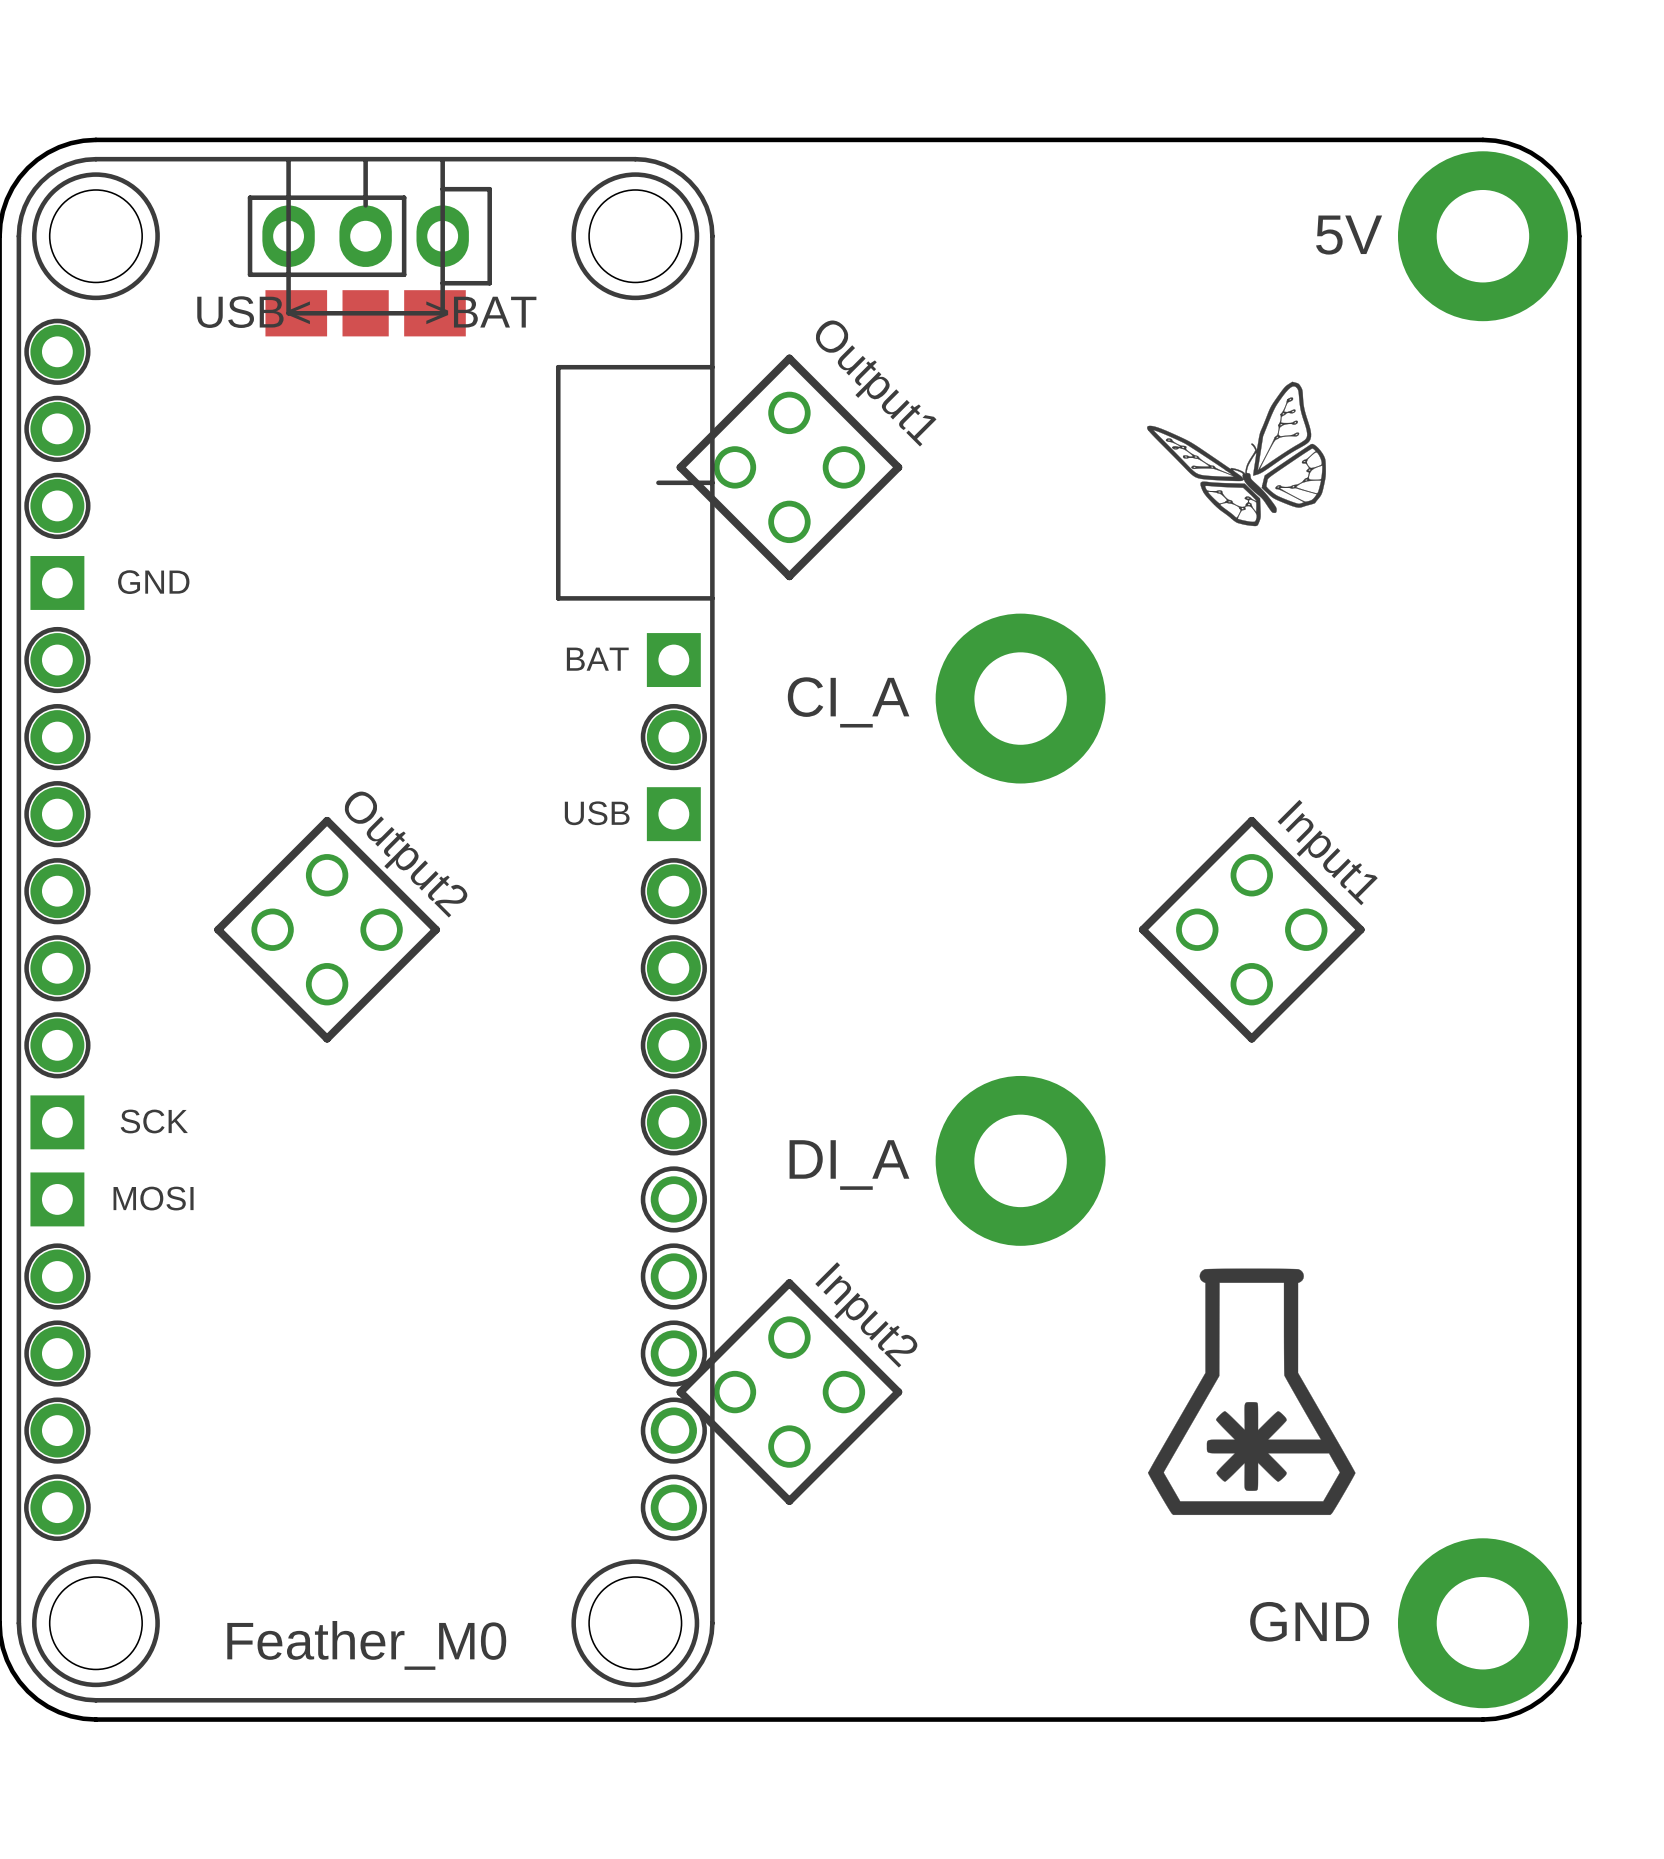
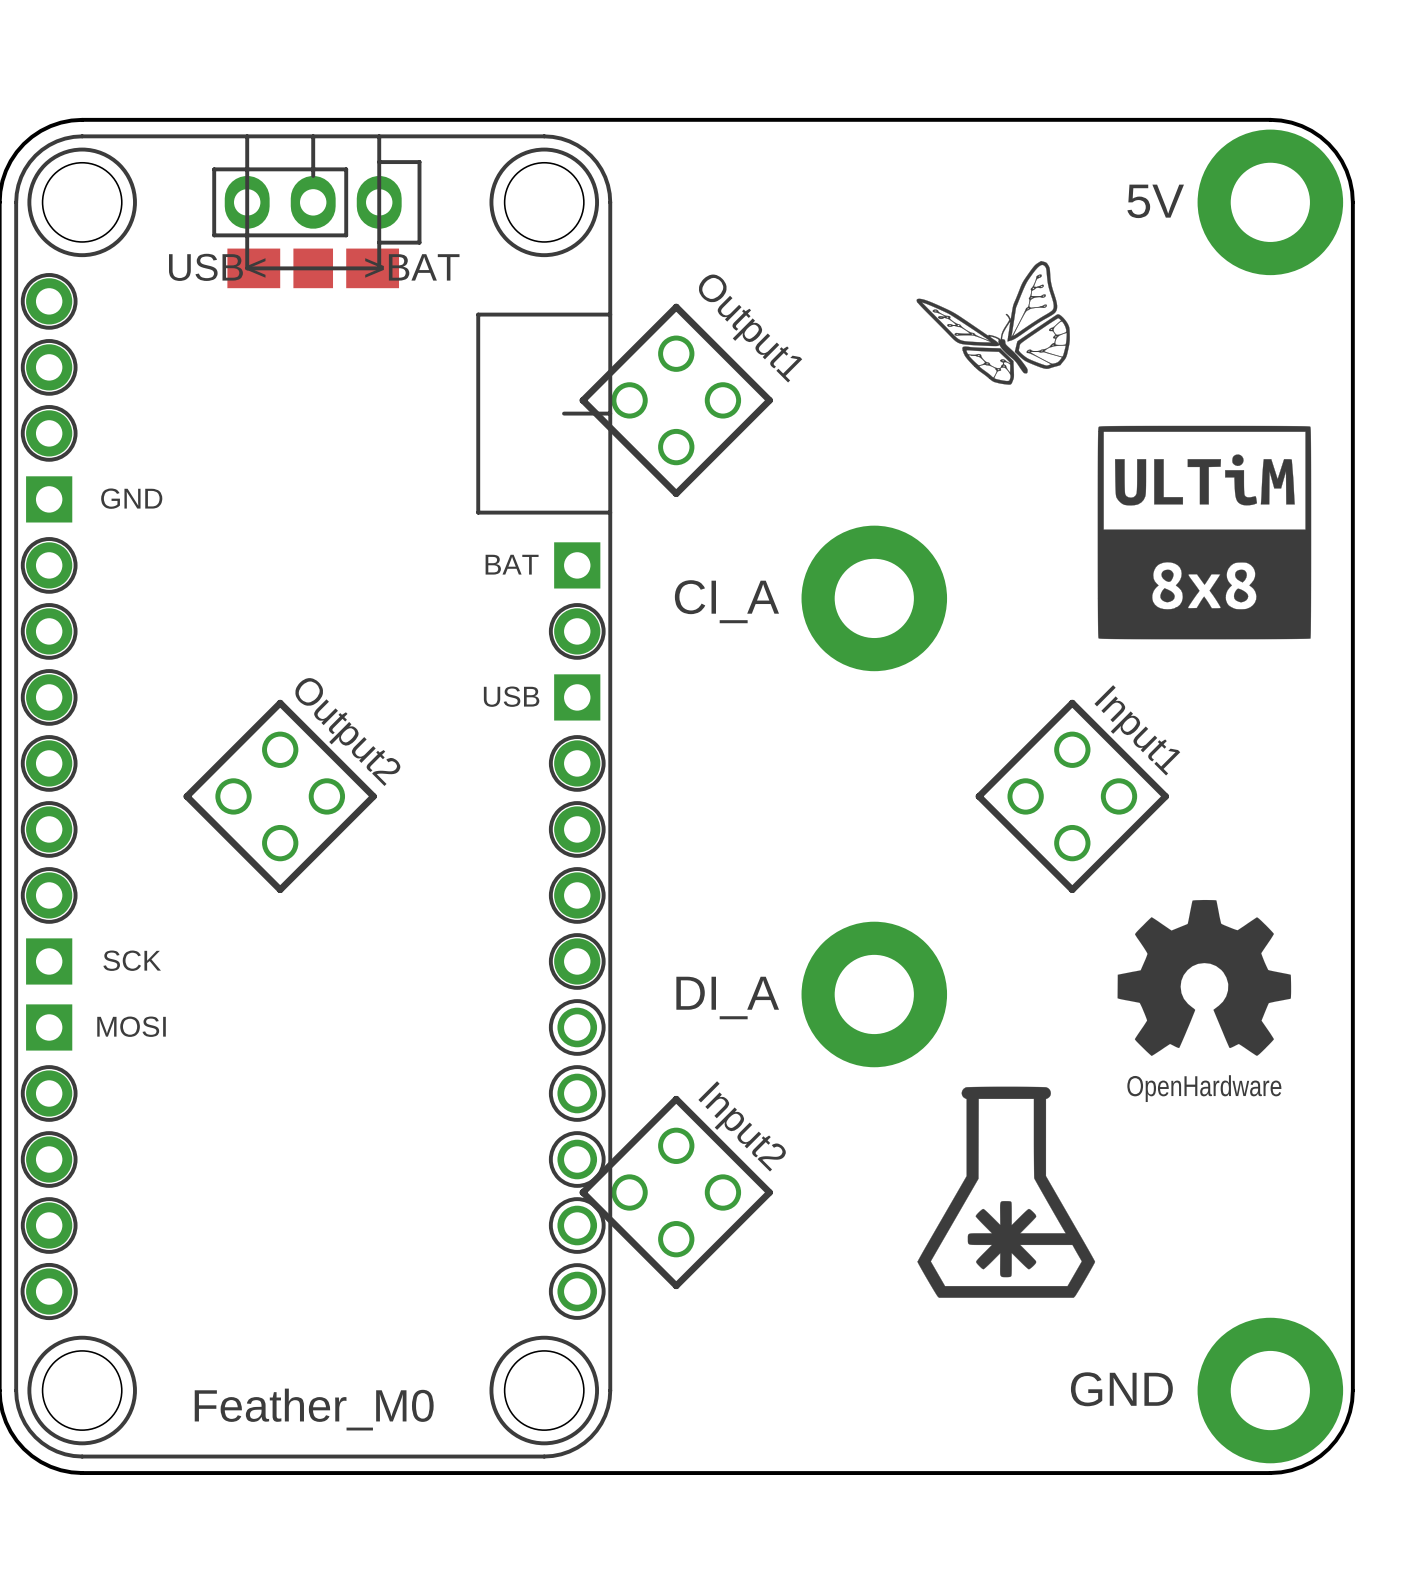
drawing position: (1236, 453) -> (993, 322)
drawing: none -> [1097, 425, 1312, 640]
drawing: none -> [1117, 899, 1292, 1056]
drawing position: (1251, 1391) -> (1006, 1192)

